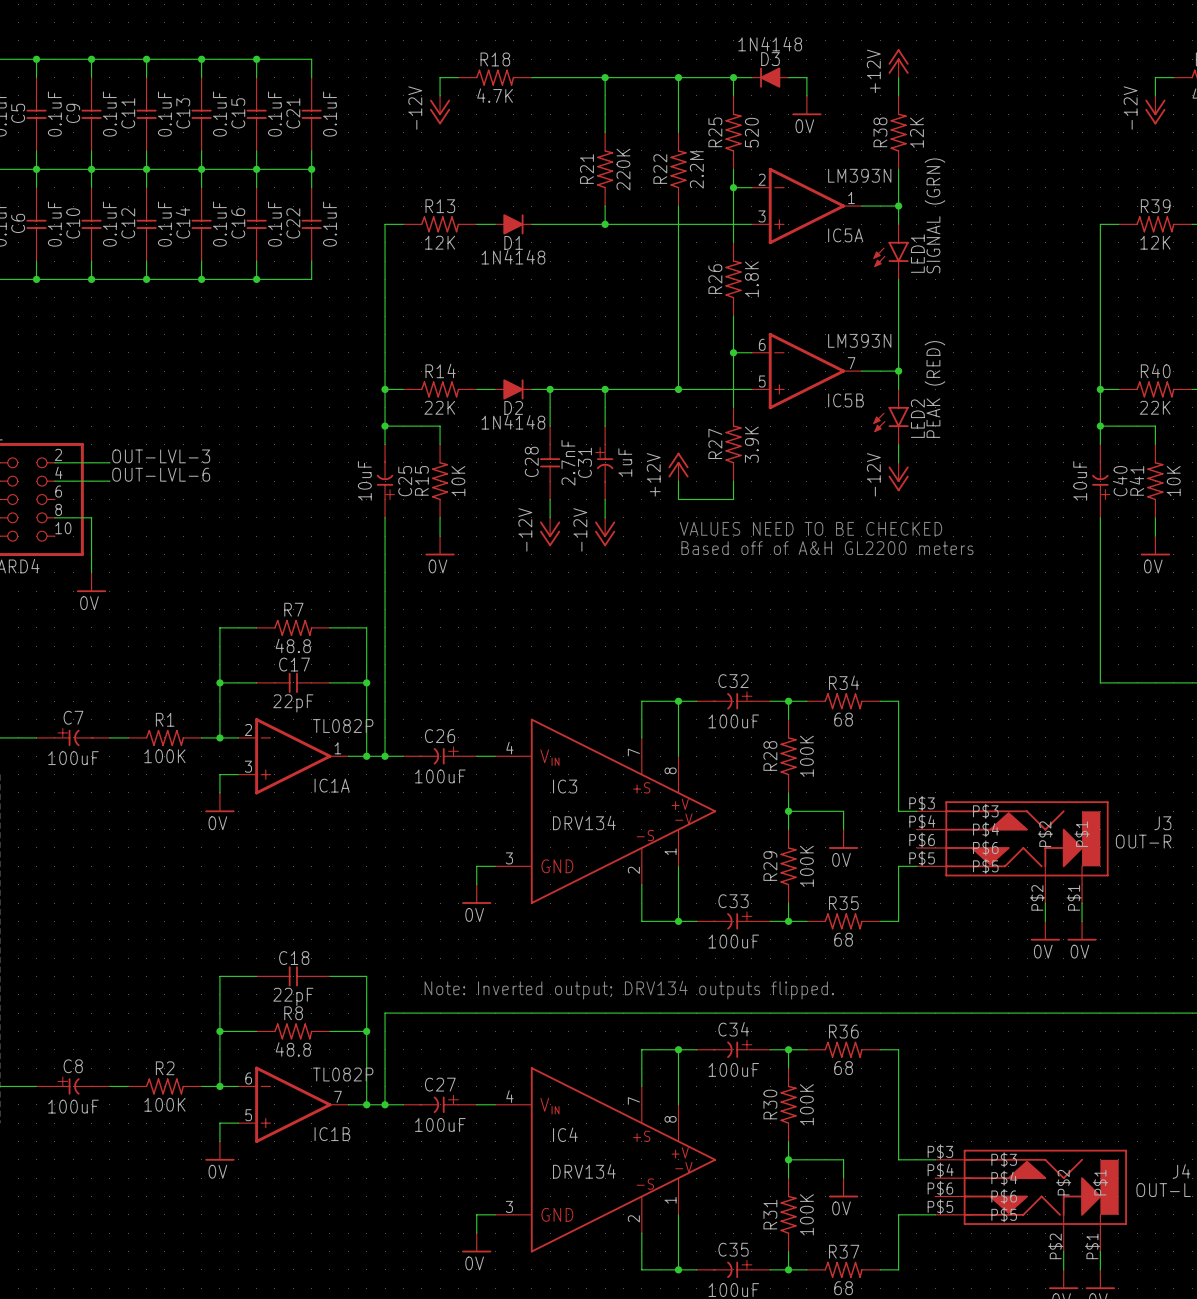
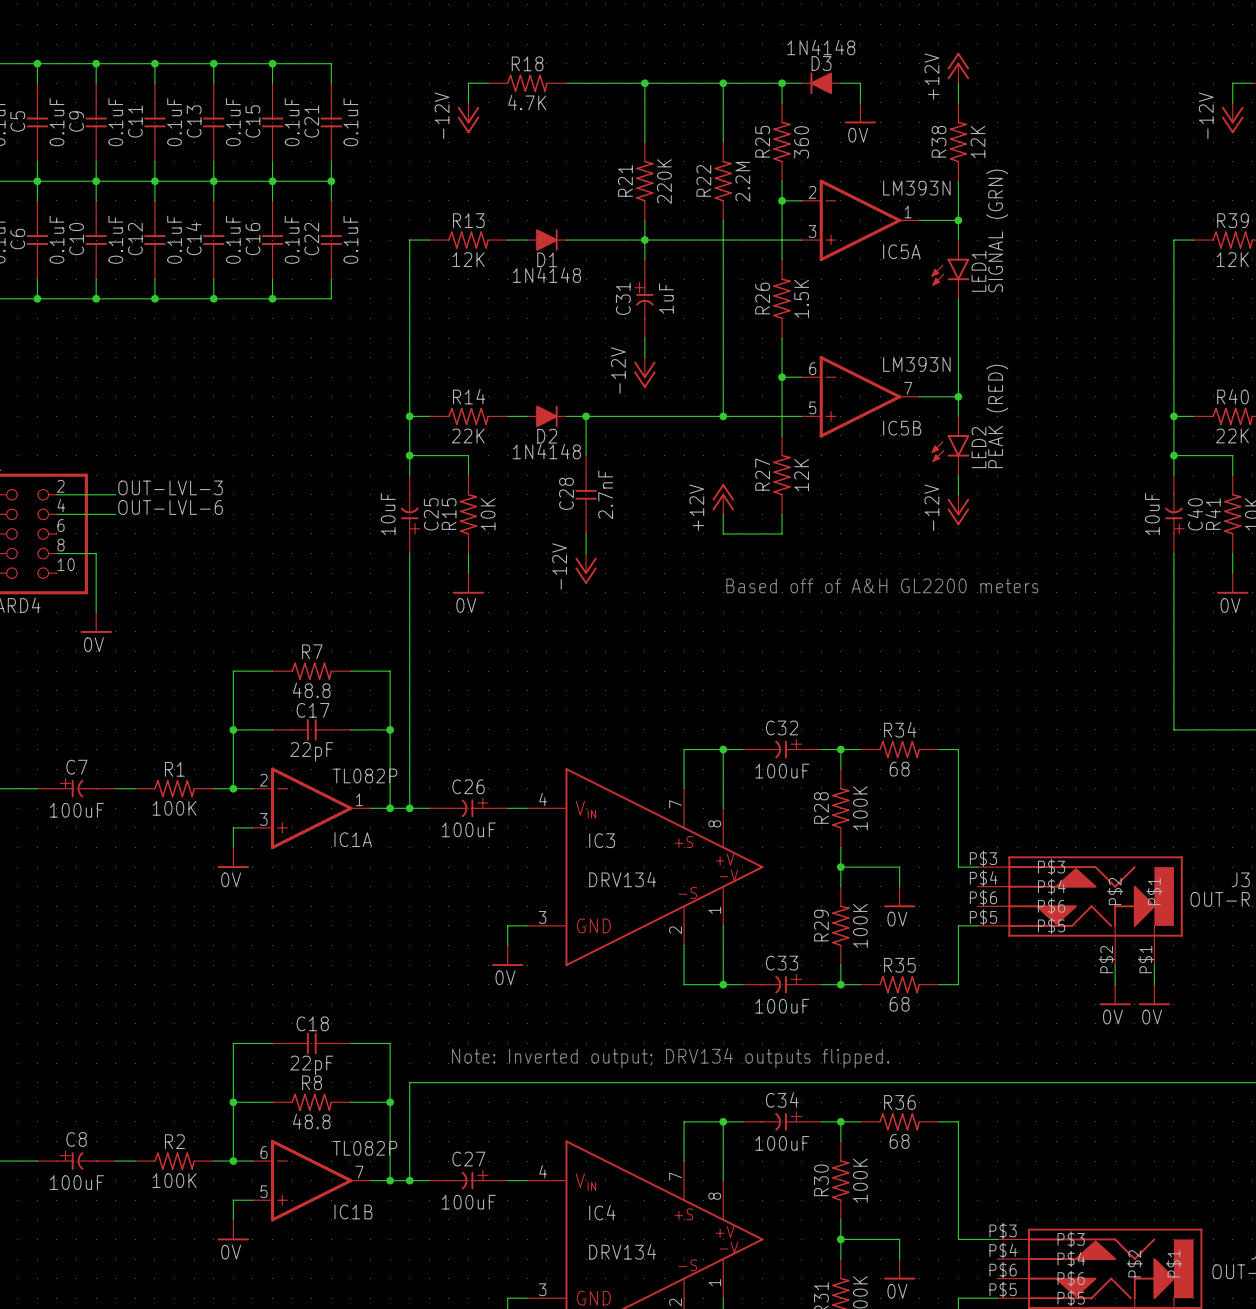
R25 value: 520 (751, 132) -> 360 (801, 142)
wire: none -> (644, 240) (644, 259)
R26 value: 1.8K (751, 279) -> 1.5K (801, 298)
wire: none -> (644, 338) (644, 357)
power symbol: none -> -12V (644, 372)
wire: (605, 389) (605, 426) -> none
junction: (605, 389) -> none
R27 value: 3.9K (751, 444) -> 12K (801, 475)
C31 position: (605, 462) -> (644, 298)
wire: (605, 499) (605, 517) -> none
text: VALUES NEED TO BE CHECKED (810, 528) -> none
power symbol: -12V (605, 532) -> none

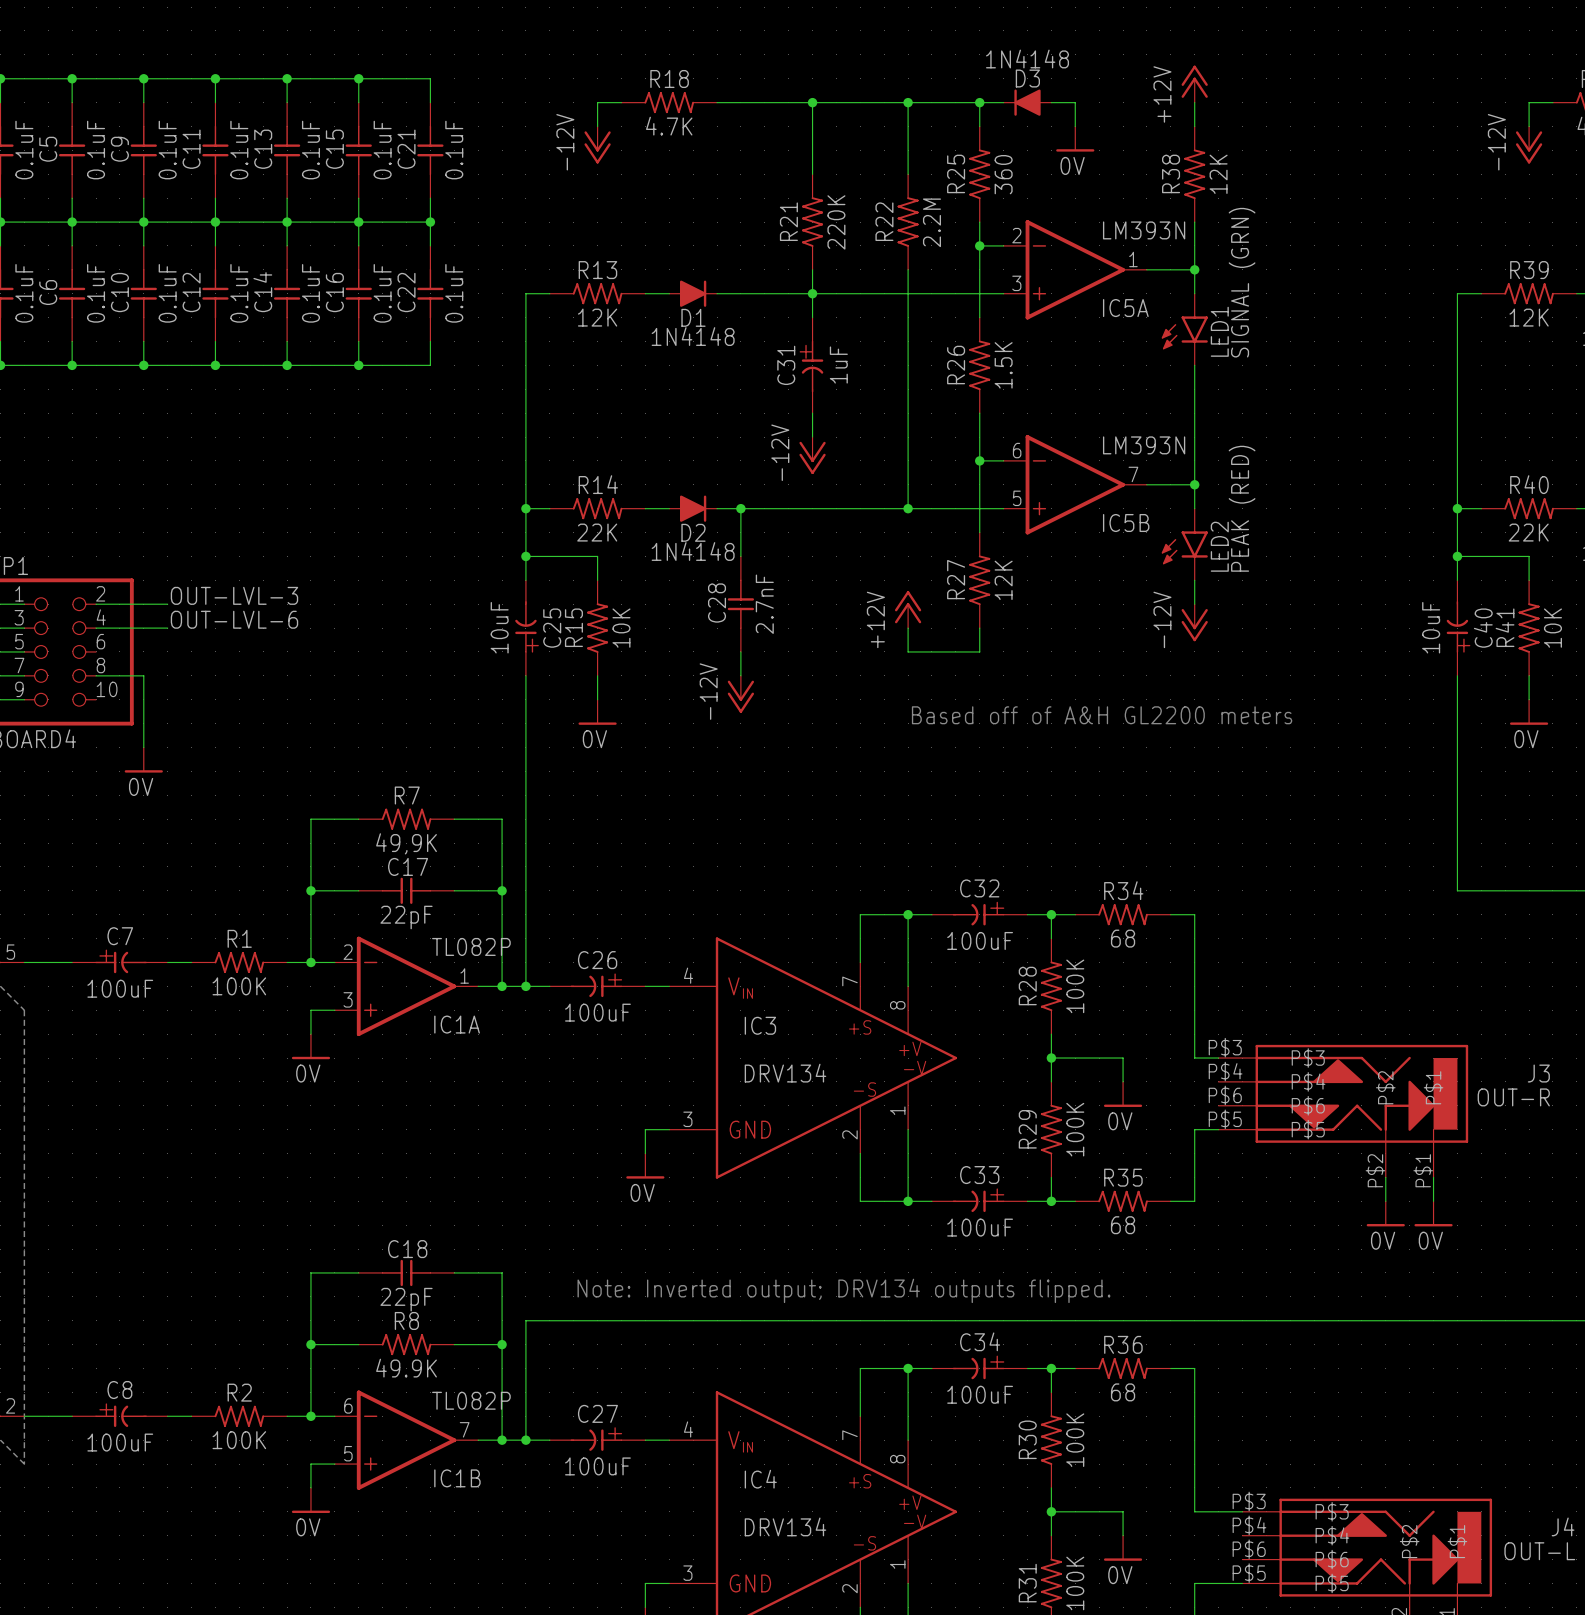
R7 value: 48.8 (311, 690) -> 49,9K (406, 843)
R8 value: 48.8 (311, 1121) -> 49.9K (406, 1368)

